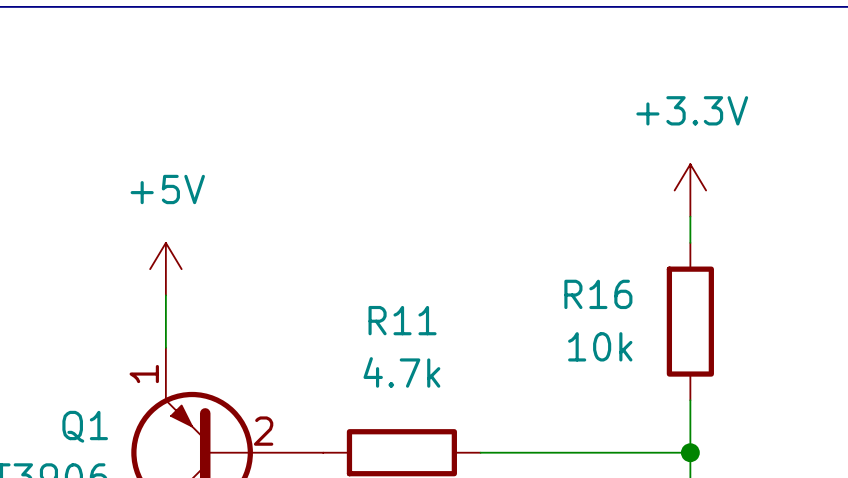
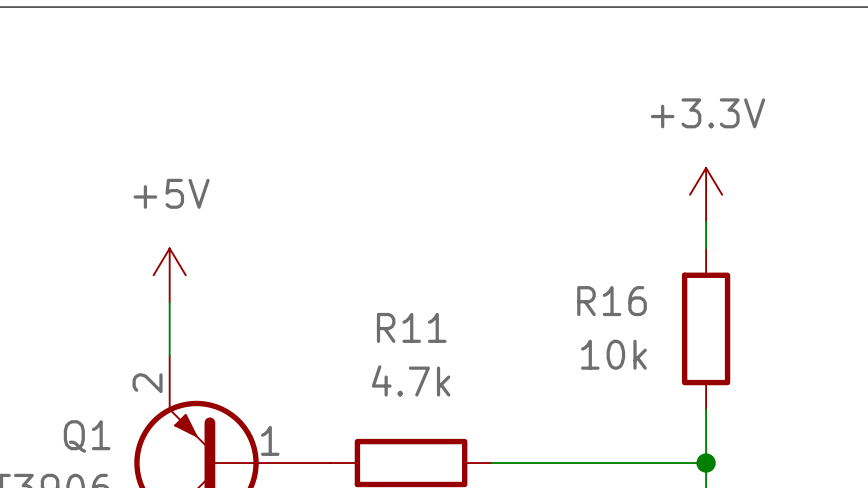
Q1 pin number: 1 (144, 374) -> 2 (147, 383)
Q1 pin number: 2 (263, 431) -> 1 (270, 440)

